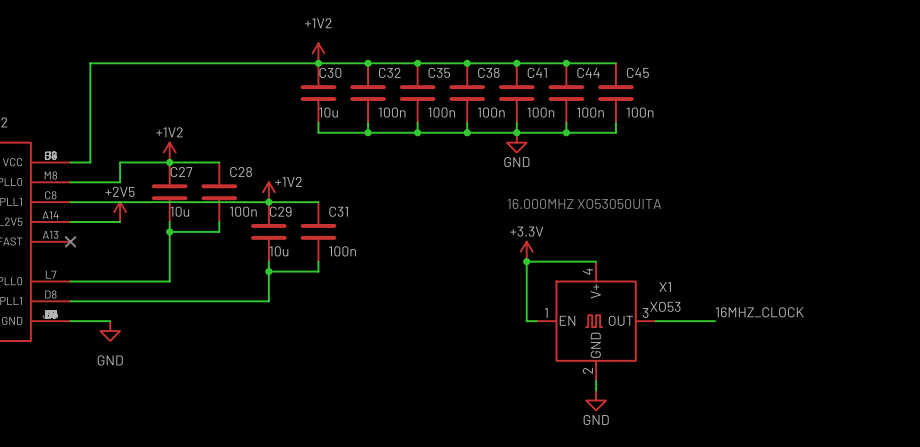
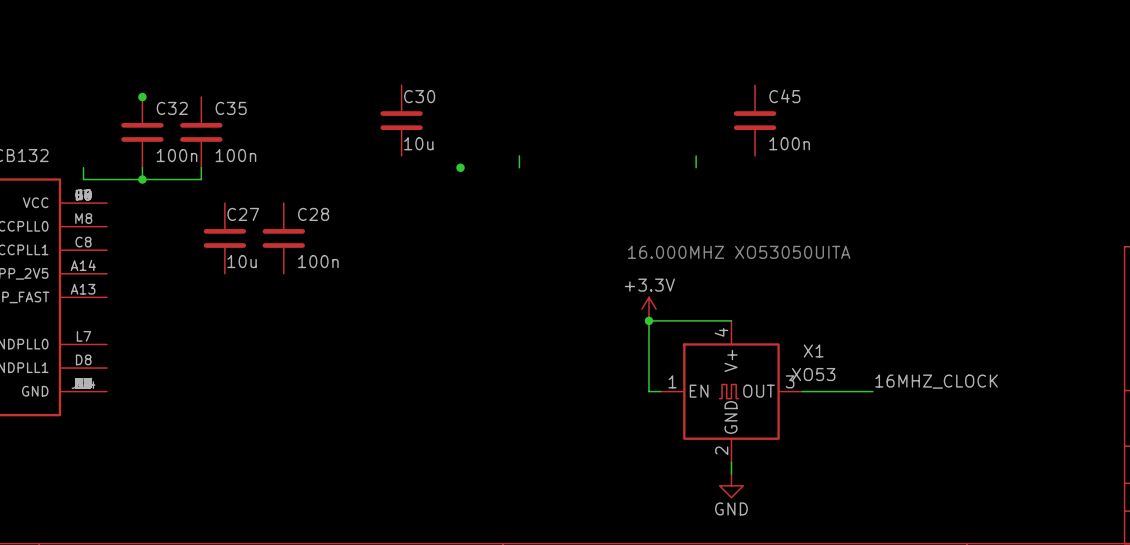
power symbol: +1V2 (318, 53) -> none
junction: (318, 63) -> none
junction: (368, 63) -> none
junction: (417, 63) -> none
junction: (467, 63) -> none
junction: (516, 63) -> none
junction: (566, 63) -> none
wire: (615, 63) (90, 63) (90, 162) (70, 162) -> none
junction: none -> (142, 97)
C32 position: (368, 93) -> (142, 132)
C35 position: (417, 93) -> (201, 132)
C38: 100n (467, 93) -> none
C41: 100n (516, 93) -> none
C44: 100n (566, 93) -> none
wire: (318, 122) (318, 132) (615, 132) (615, 122) -> none
wire: (368, 122) (368, 132) -> none
wire: (467, 122) (467, 132) -> none
wire: (516, 122) (516, 132) -> none
wire: none -> (83, 167) (83, 179) (201, 179) (201, 167)
wire: none -> (142, 167) (142, 179)
junction: (417, 132) -> none
junction: (467, 132) -> none
junction: (516, 132) -> none
junction: (566, 132) -> none
junction: none -> (142, 179)
power symbol: GND (516, 142) -> none
power symbol: +1V2 (169, 152) -> none
junction: (169, 162) -> none
wire: (219, 162) (120, 162) (120, 182) (70, 182) -> none
power symbol: +1V2 (268, 192) -> none
wire: (70, 202) (318, 202) -> none
junction: (268, 202) -> none
power symbol: +2V5 (120, 212) -> none
wire: (70, 221) (120, 221) -> none
wire: (169, 221) (169, 281) (70, 281) -> none
wire: (219, 221) (219, 231) (169, 231) -> none
junction: (169, 231) -> none
C29: 10u (268, 231) -> none
C31: 100n (318, 231) -> none
no-connect mark: (70, 241) -> none
wire: (268, 261) (268, 301) (70, 301) -> none
wire: (318, 261) (318, 271) (268, 271) -> none
junction: (268, 271) -> none
wire: (70, 321) (110, 321) -> none
power symbol: GND (110, 331) -> none

